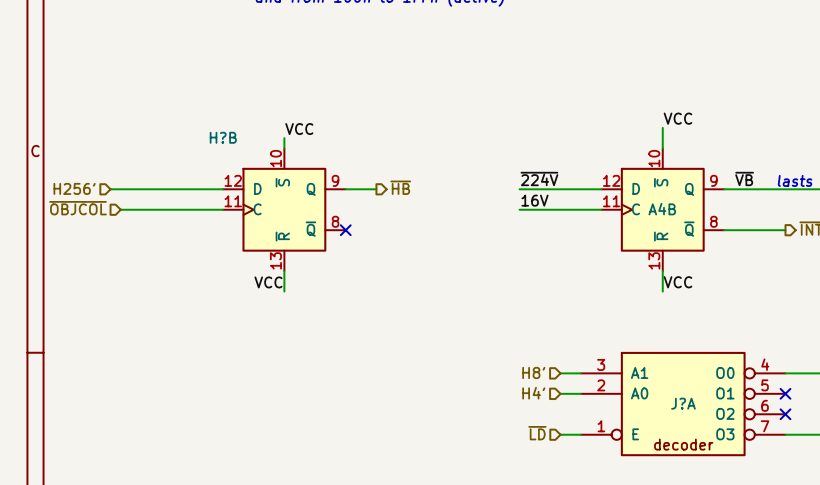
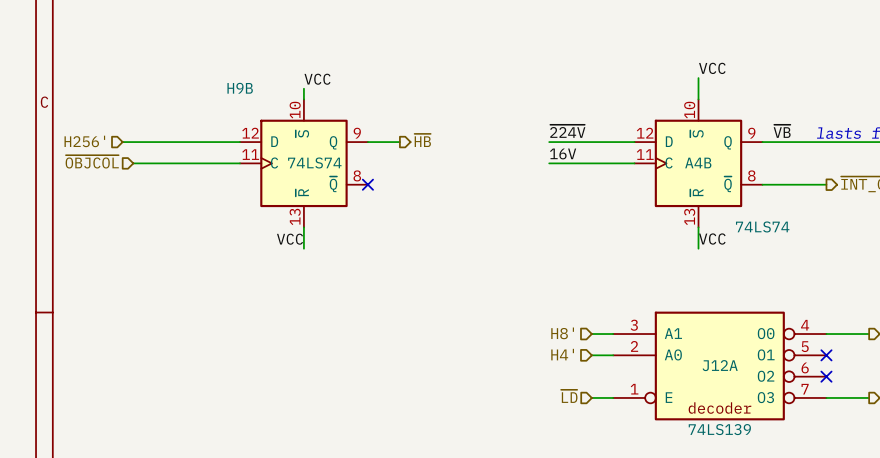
H?B name: H?B (223, 137) -> H9B (240, 88)
H?B value: none -> 74LS74 (314, 162)
A4B value: none -> 74LS74 (762, 226)
J?A name: J?A (683, 403) -> J12A (720, 365)
J?A value: none -> 74LS139 (719, 429)

